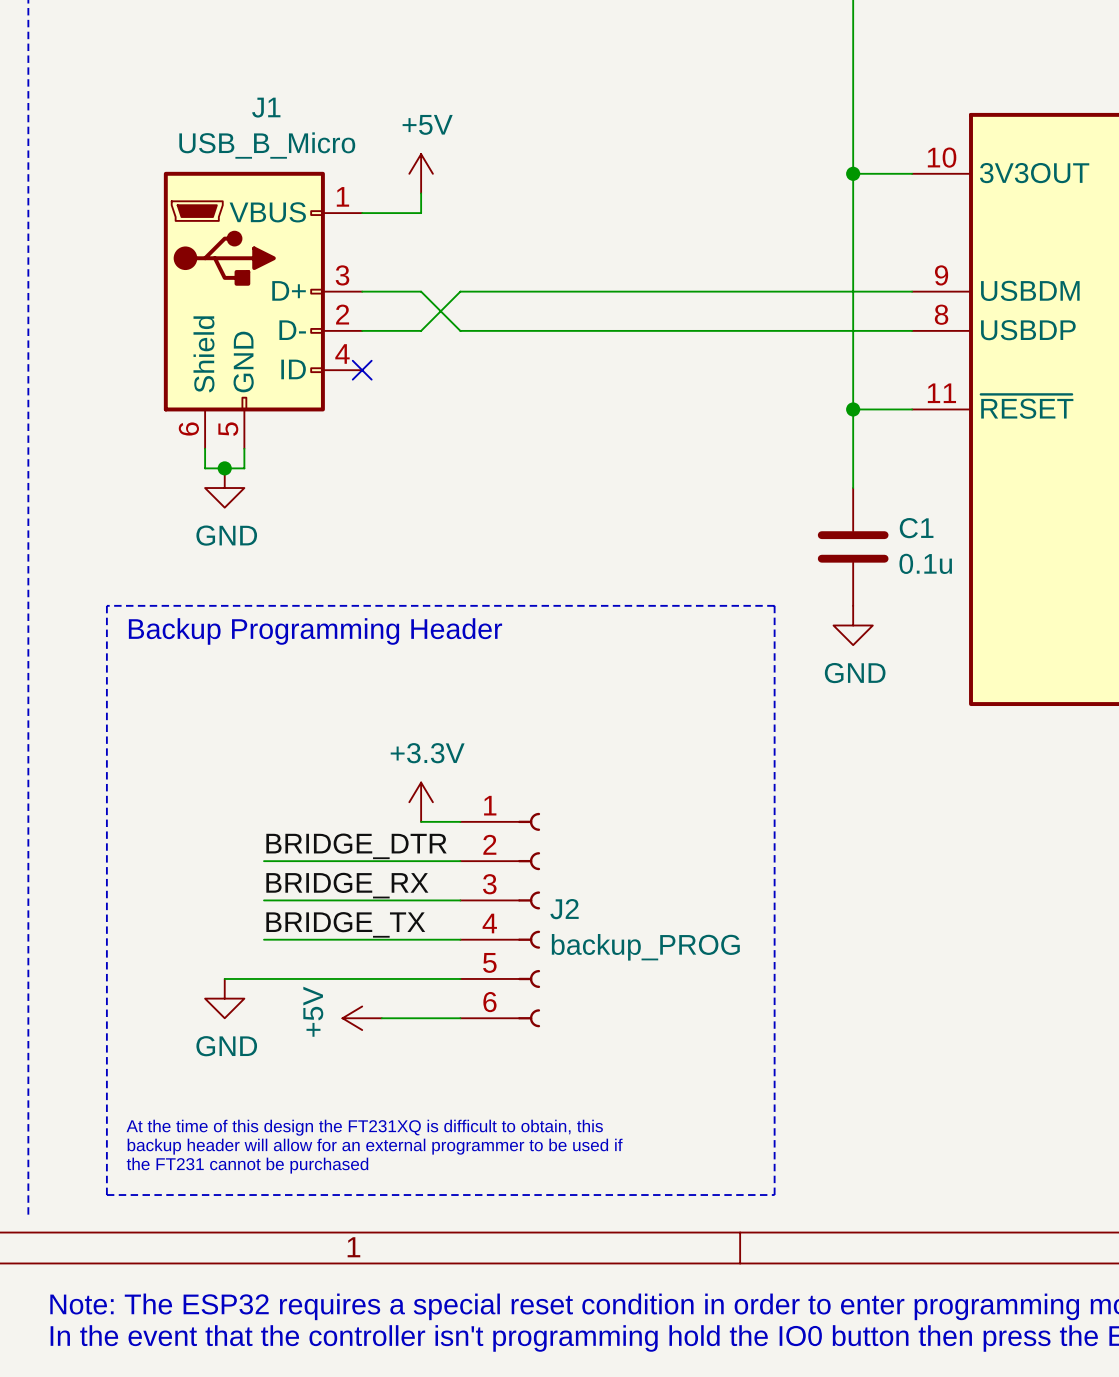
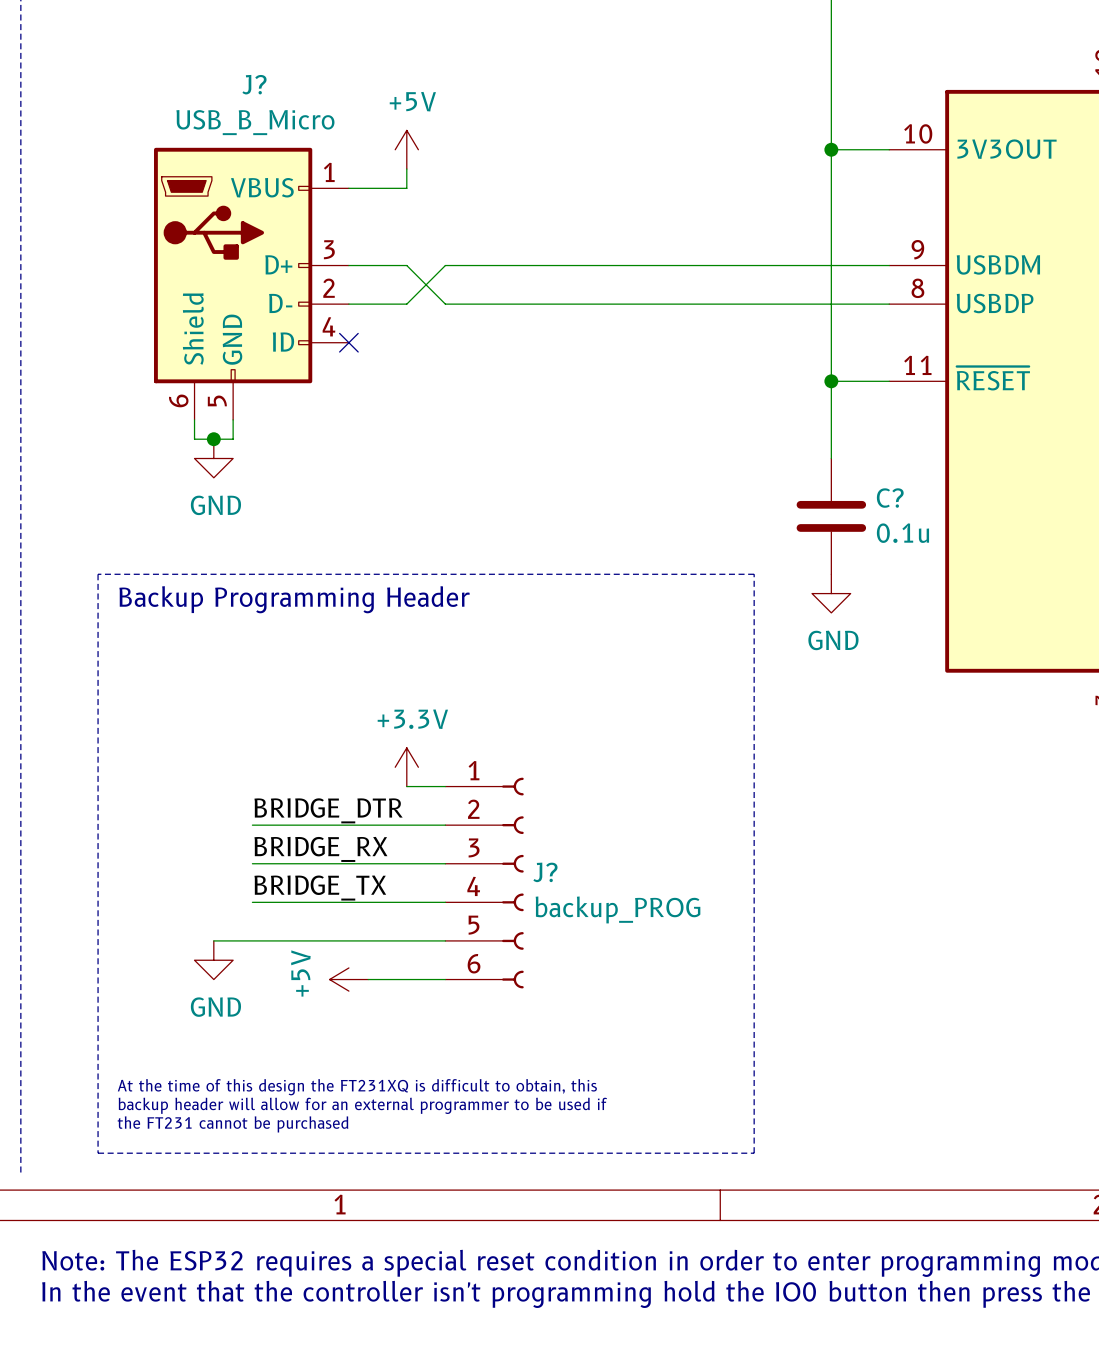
J1 name: J1 (266, 107) -> J? (254, 84)
C1 name: C1 (916, 528) -> C? (890, 498)
J2 name: J2 (564, 909) -> J? (545, 872)

